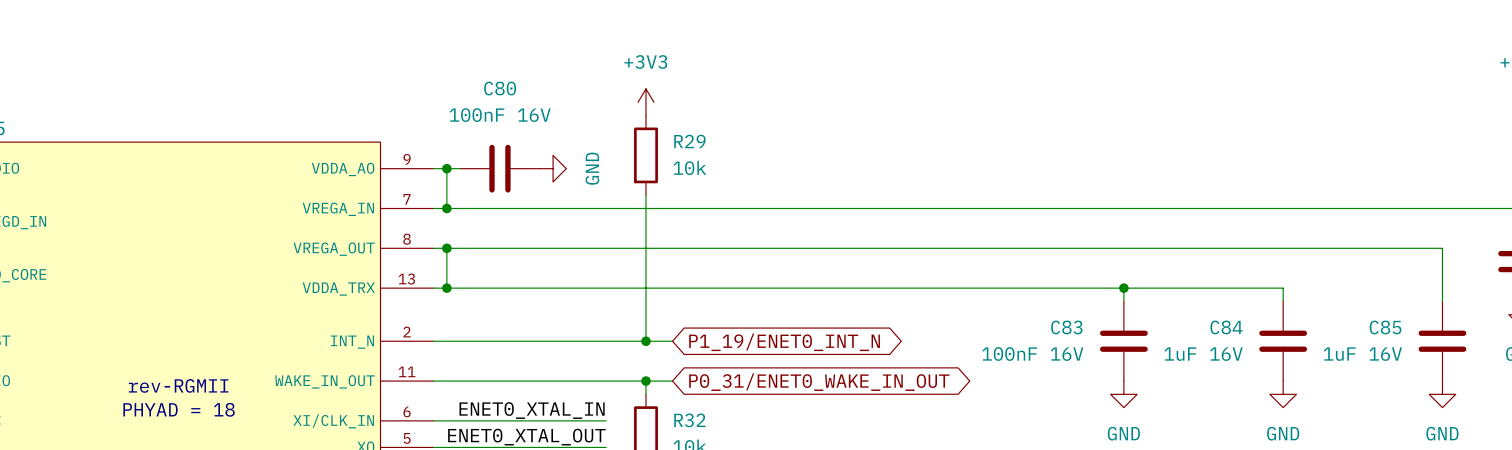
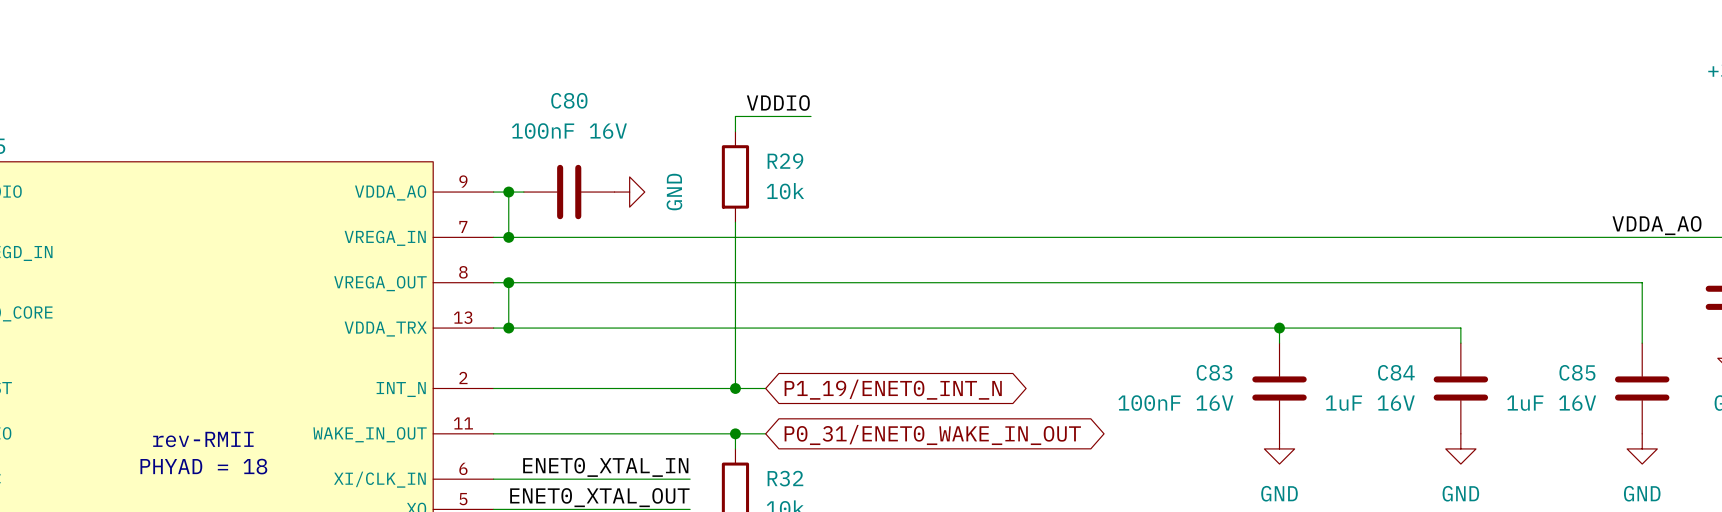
label: none -> VDDIO (778, 102)
power symbol: +3V3 (645, 102) -> none
wire: none -> (811, 116) (735, 116) (735, 131)
label: none -> VDDA_AO (1656, 225)
text: rev-RGMII (178, 385) -> rev-RMII (203, 439)

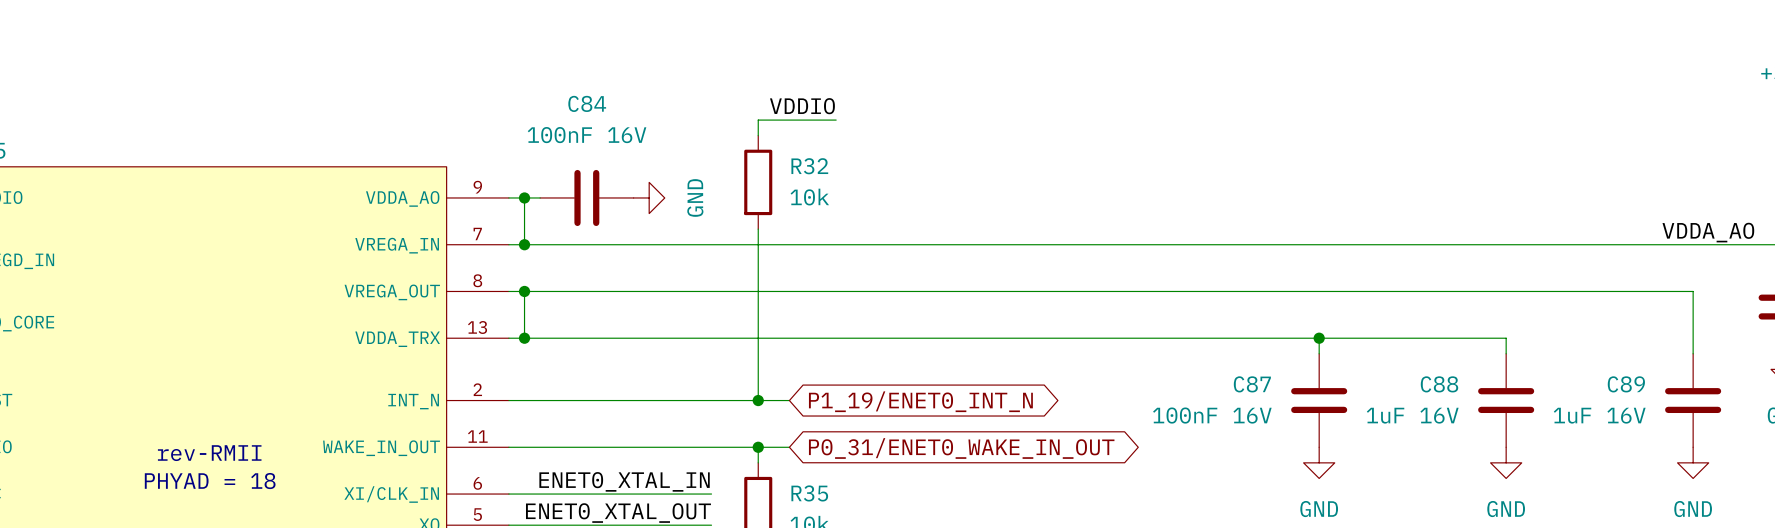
C80 name: C80 (569, 100) -> C84 (587, 103)
R29 name: R29 (785, 161) -> R32 (809, 166)
C83 name: C83 (1214, 372) -> C87 (1252, 384)
C84 name: C84 (1396, 372) -> C88 (1439, 384)
C85 name: C85 (1577, 372) -> C89 (1626, 384)
R32 name: R32 (785, 478) -> R35 (809, 493)

